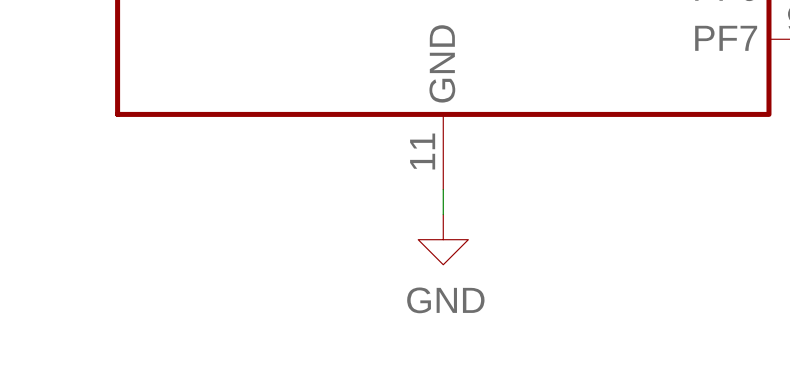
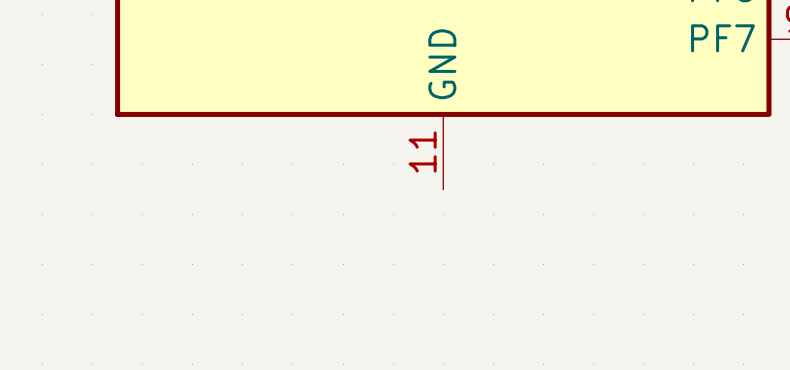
wire: (443, 189) (443, 214) -> none
power symbol: GND (443, 239) -> none

